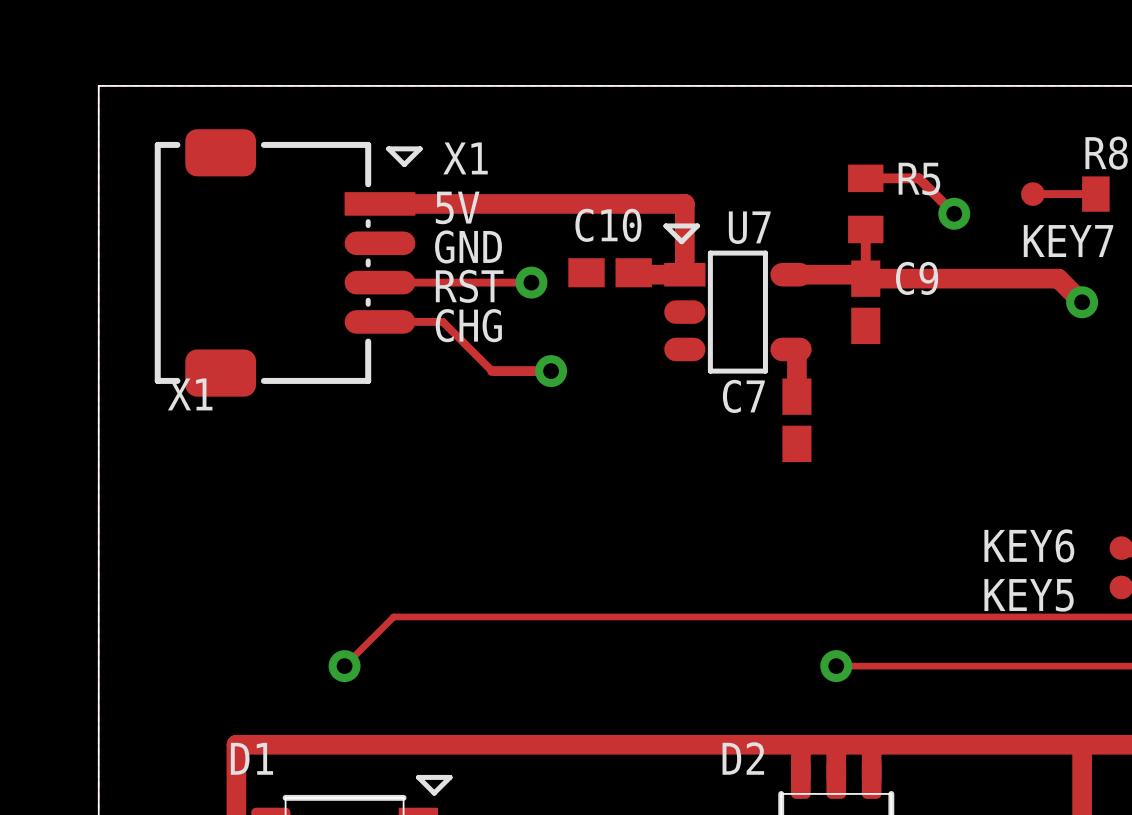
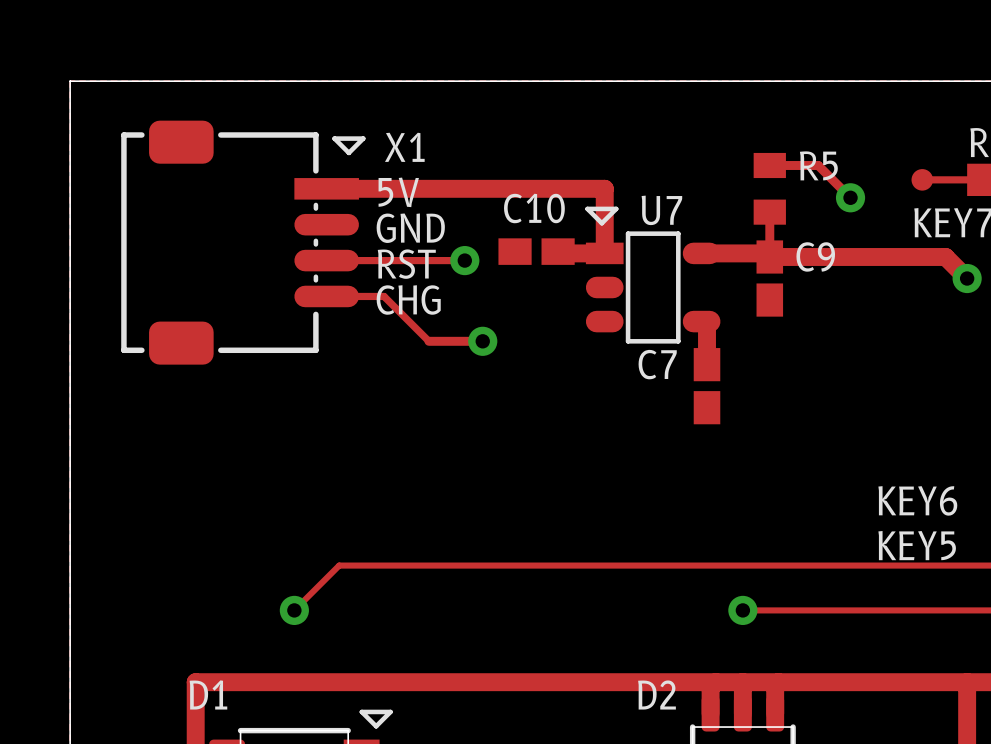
text: X1 (190, 394) -> none

